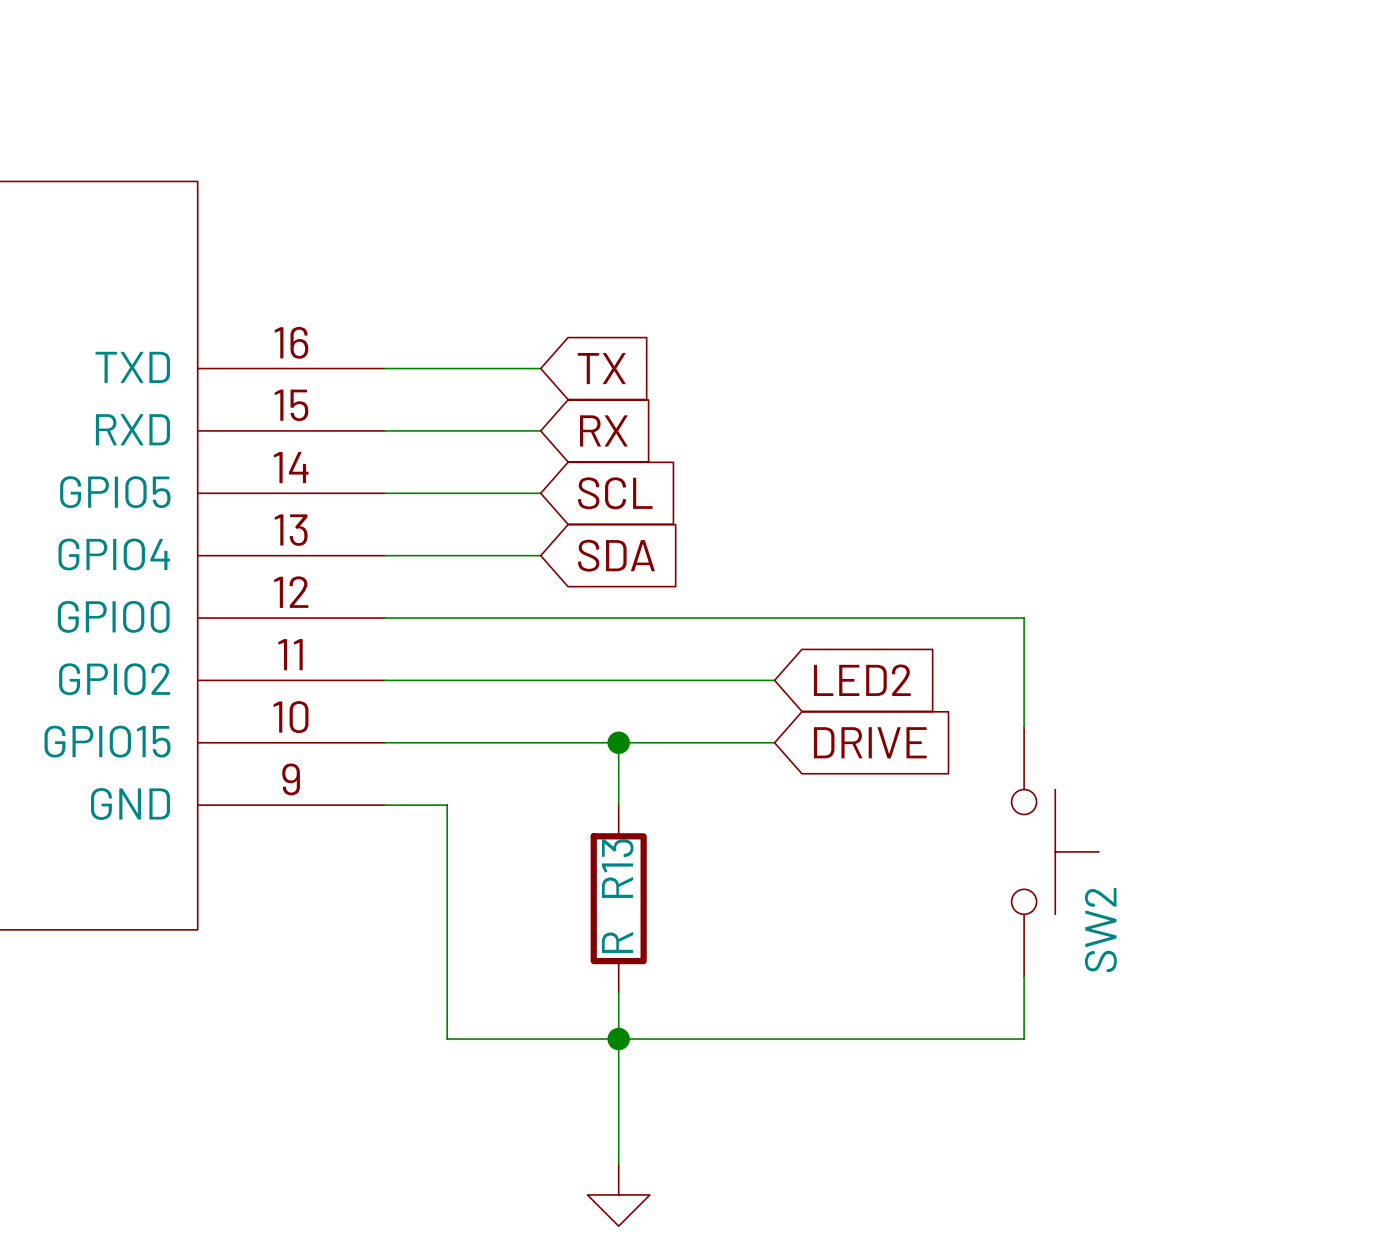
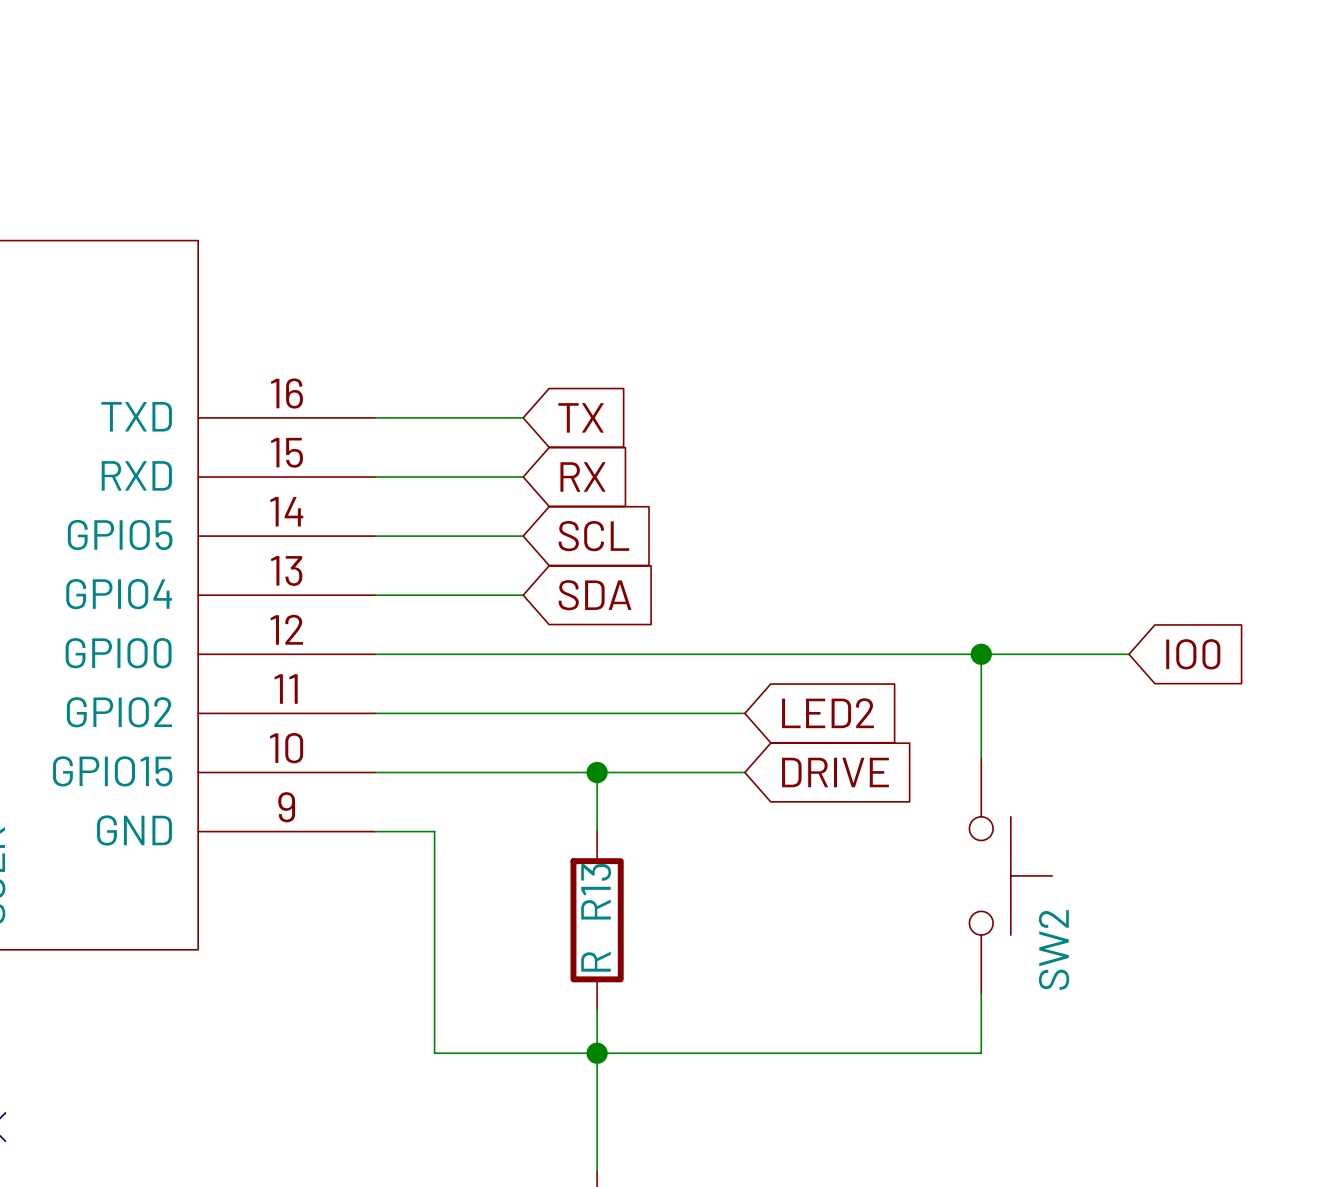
wire: none -> (981, 654) (1129, 654)
junction: none -> (981, 654)
global label: none -> IO0 (1193, 654)

